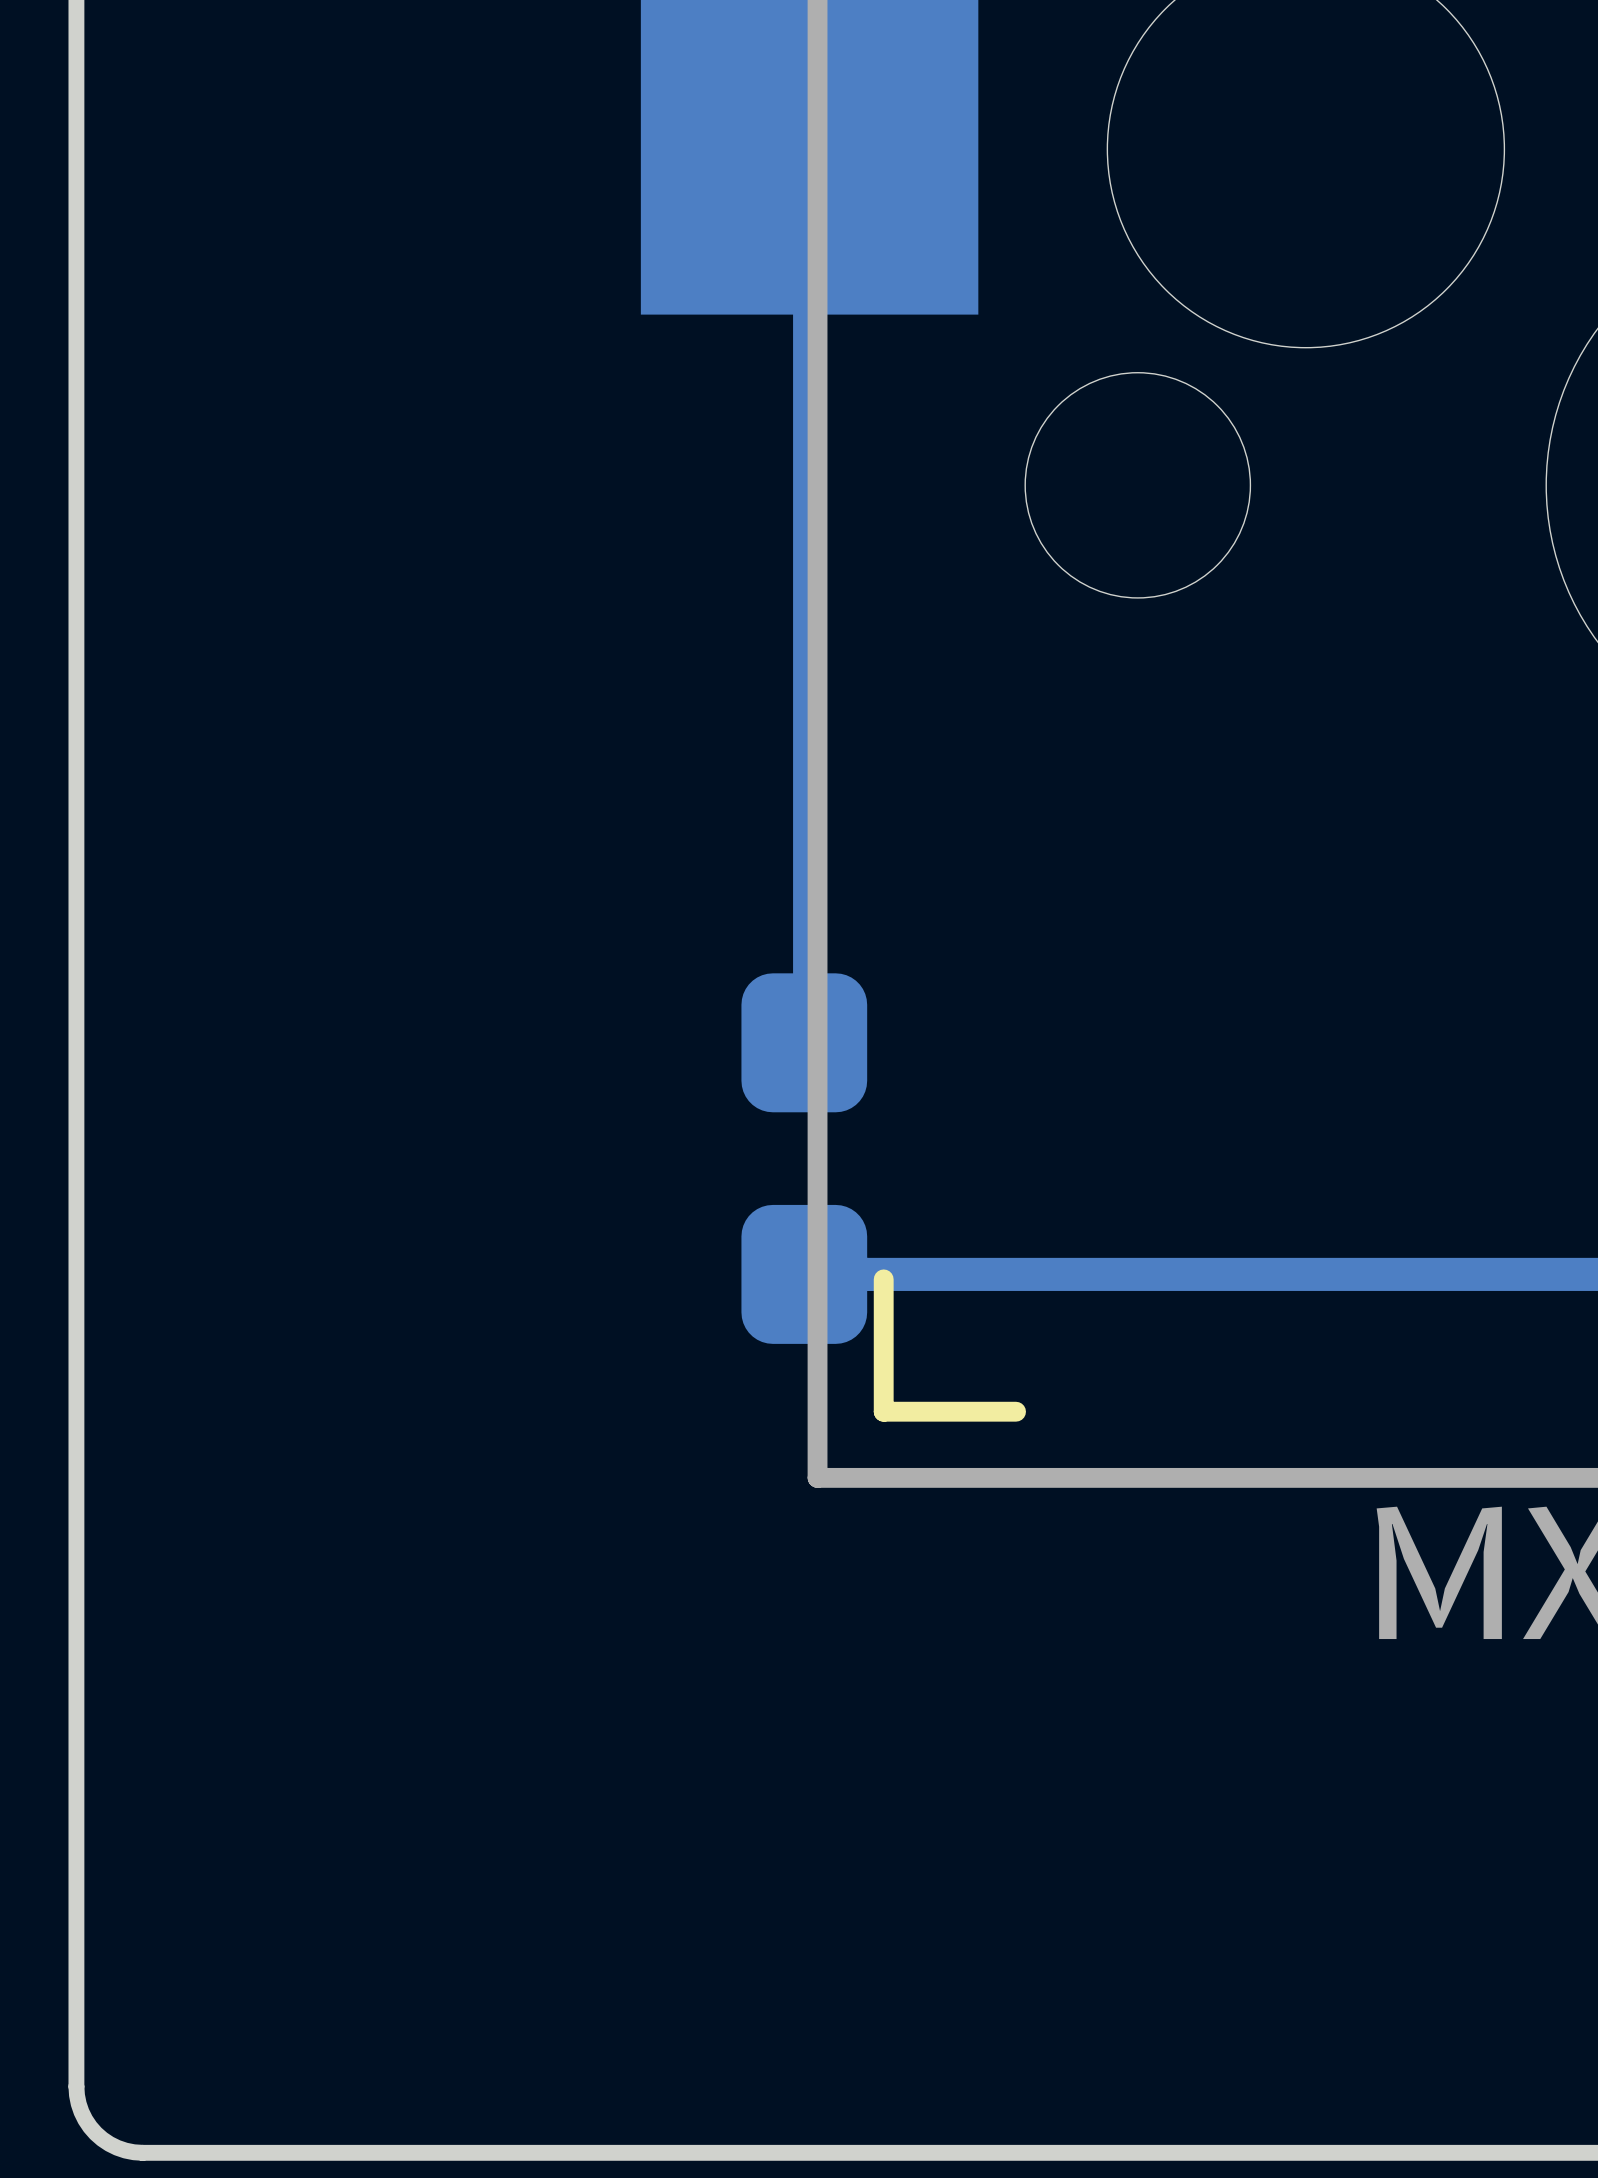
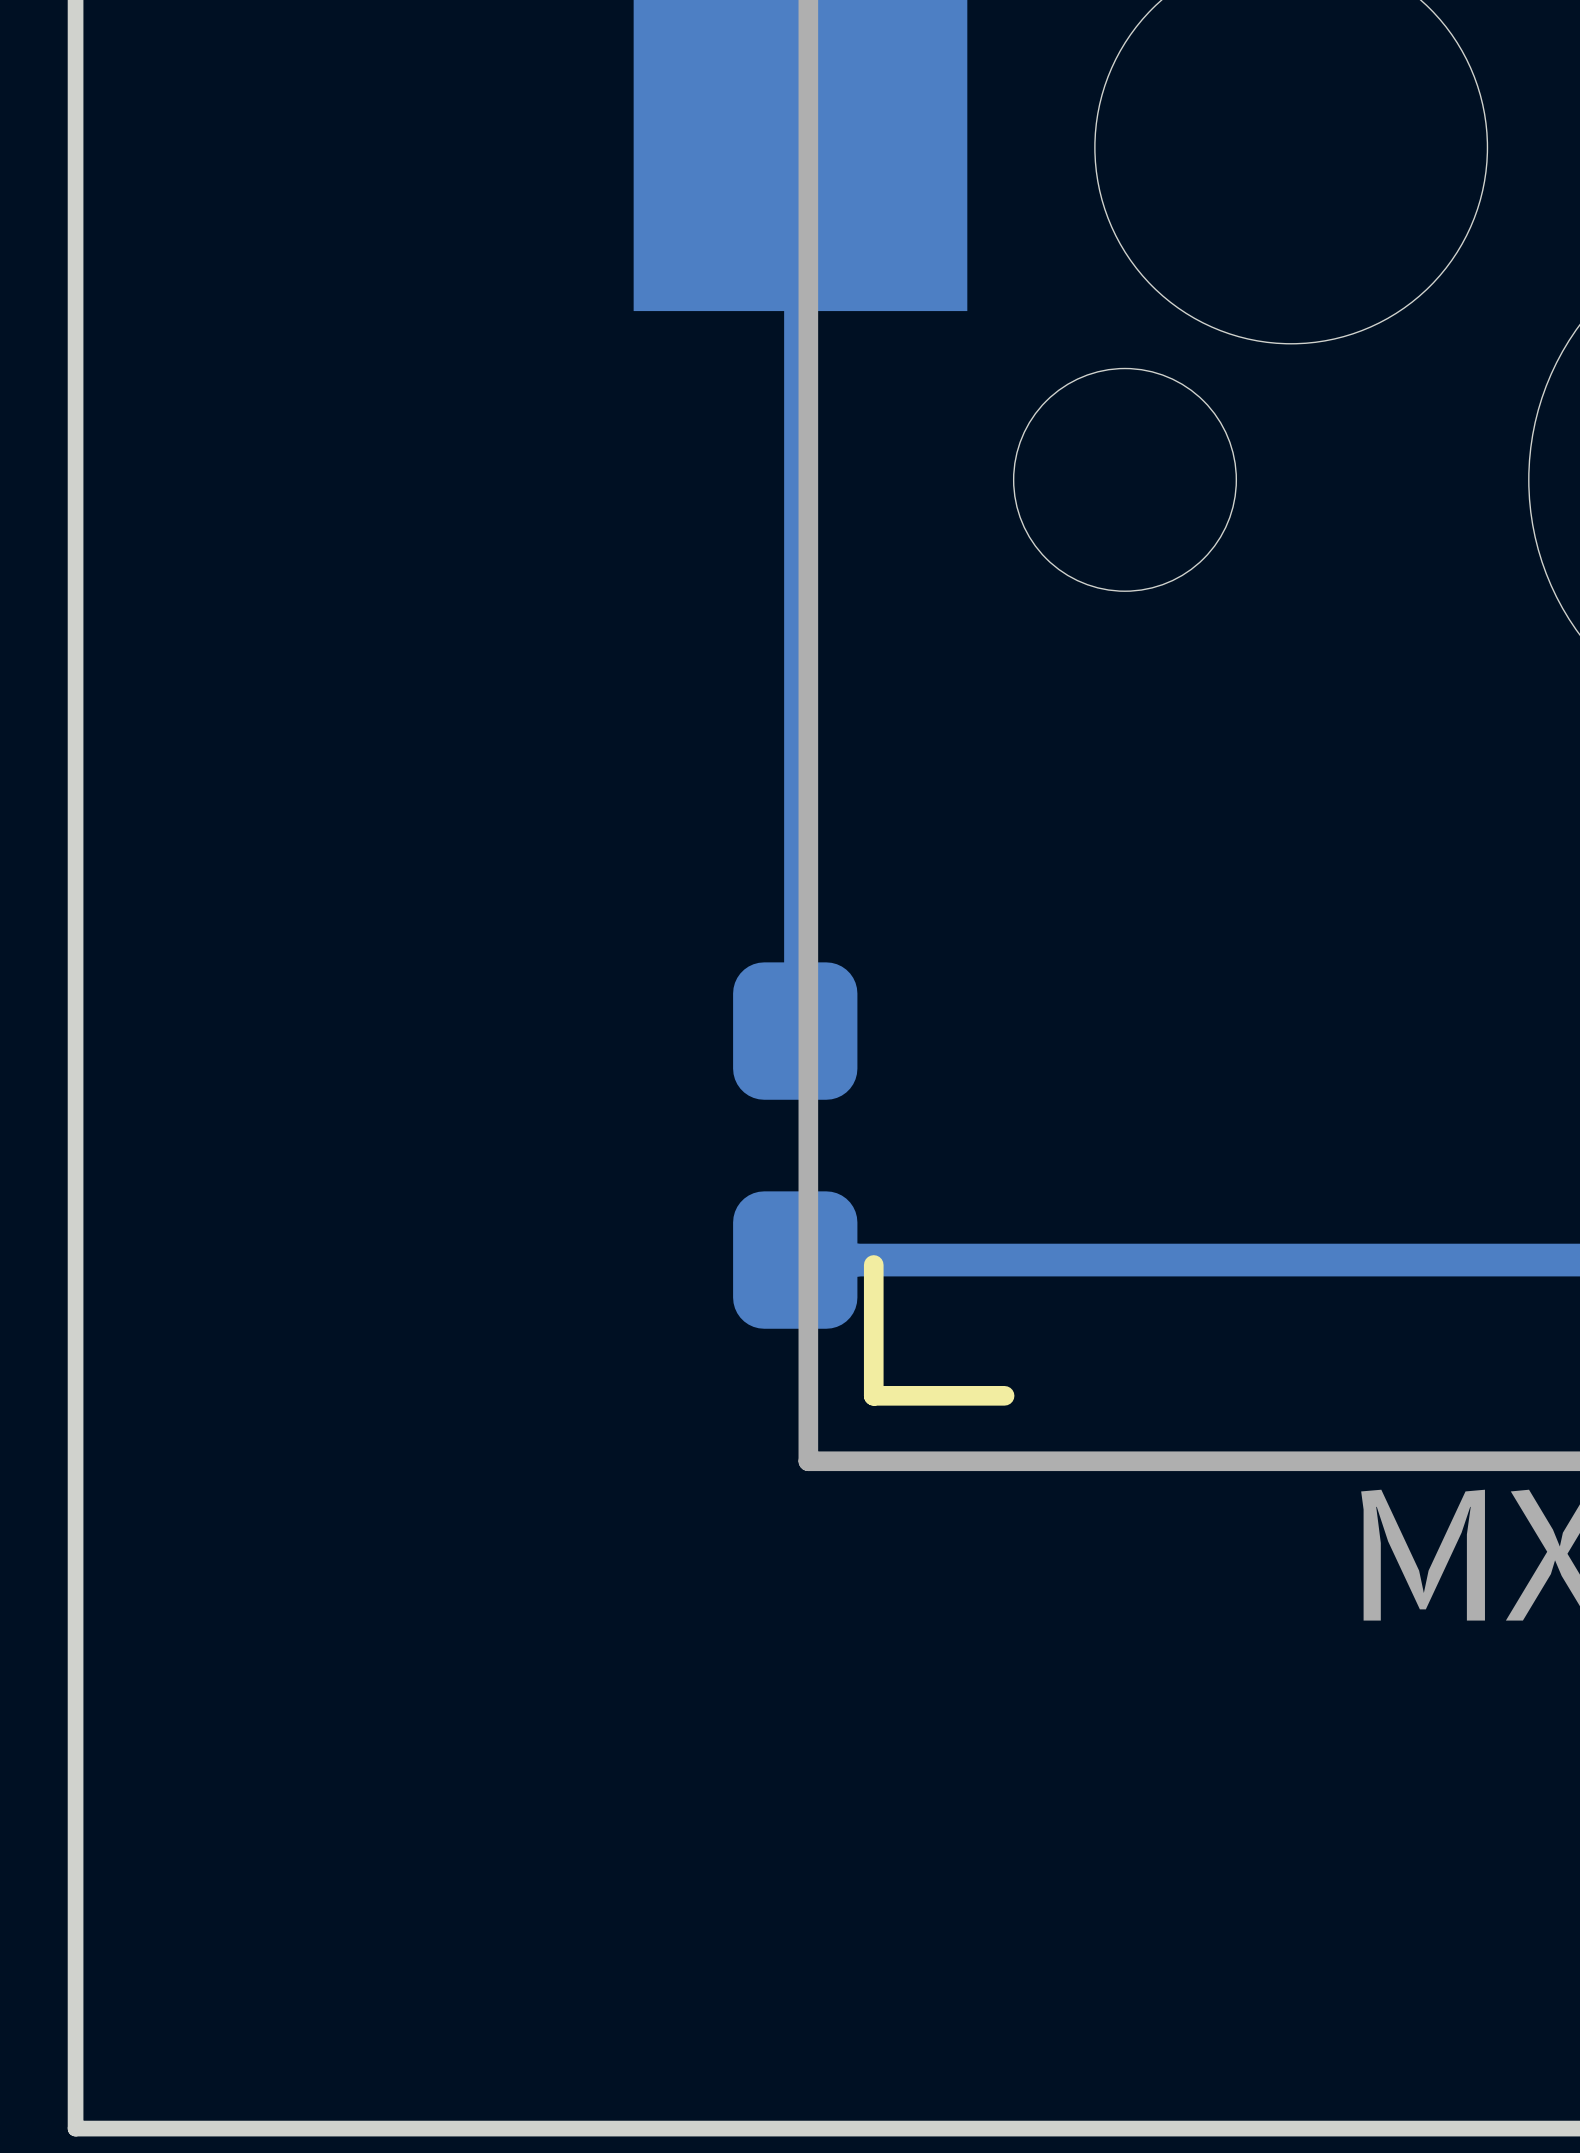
board edge: (76, 2086) (81, 2111) (95, 2133) (117, 2147) (142, 2152) -> (75, 2063) (75, 2128) (140, 2128)

